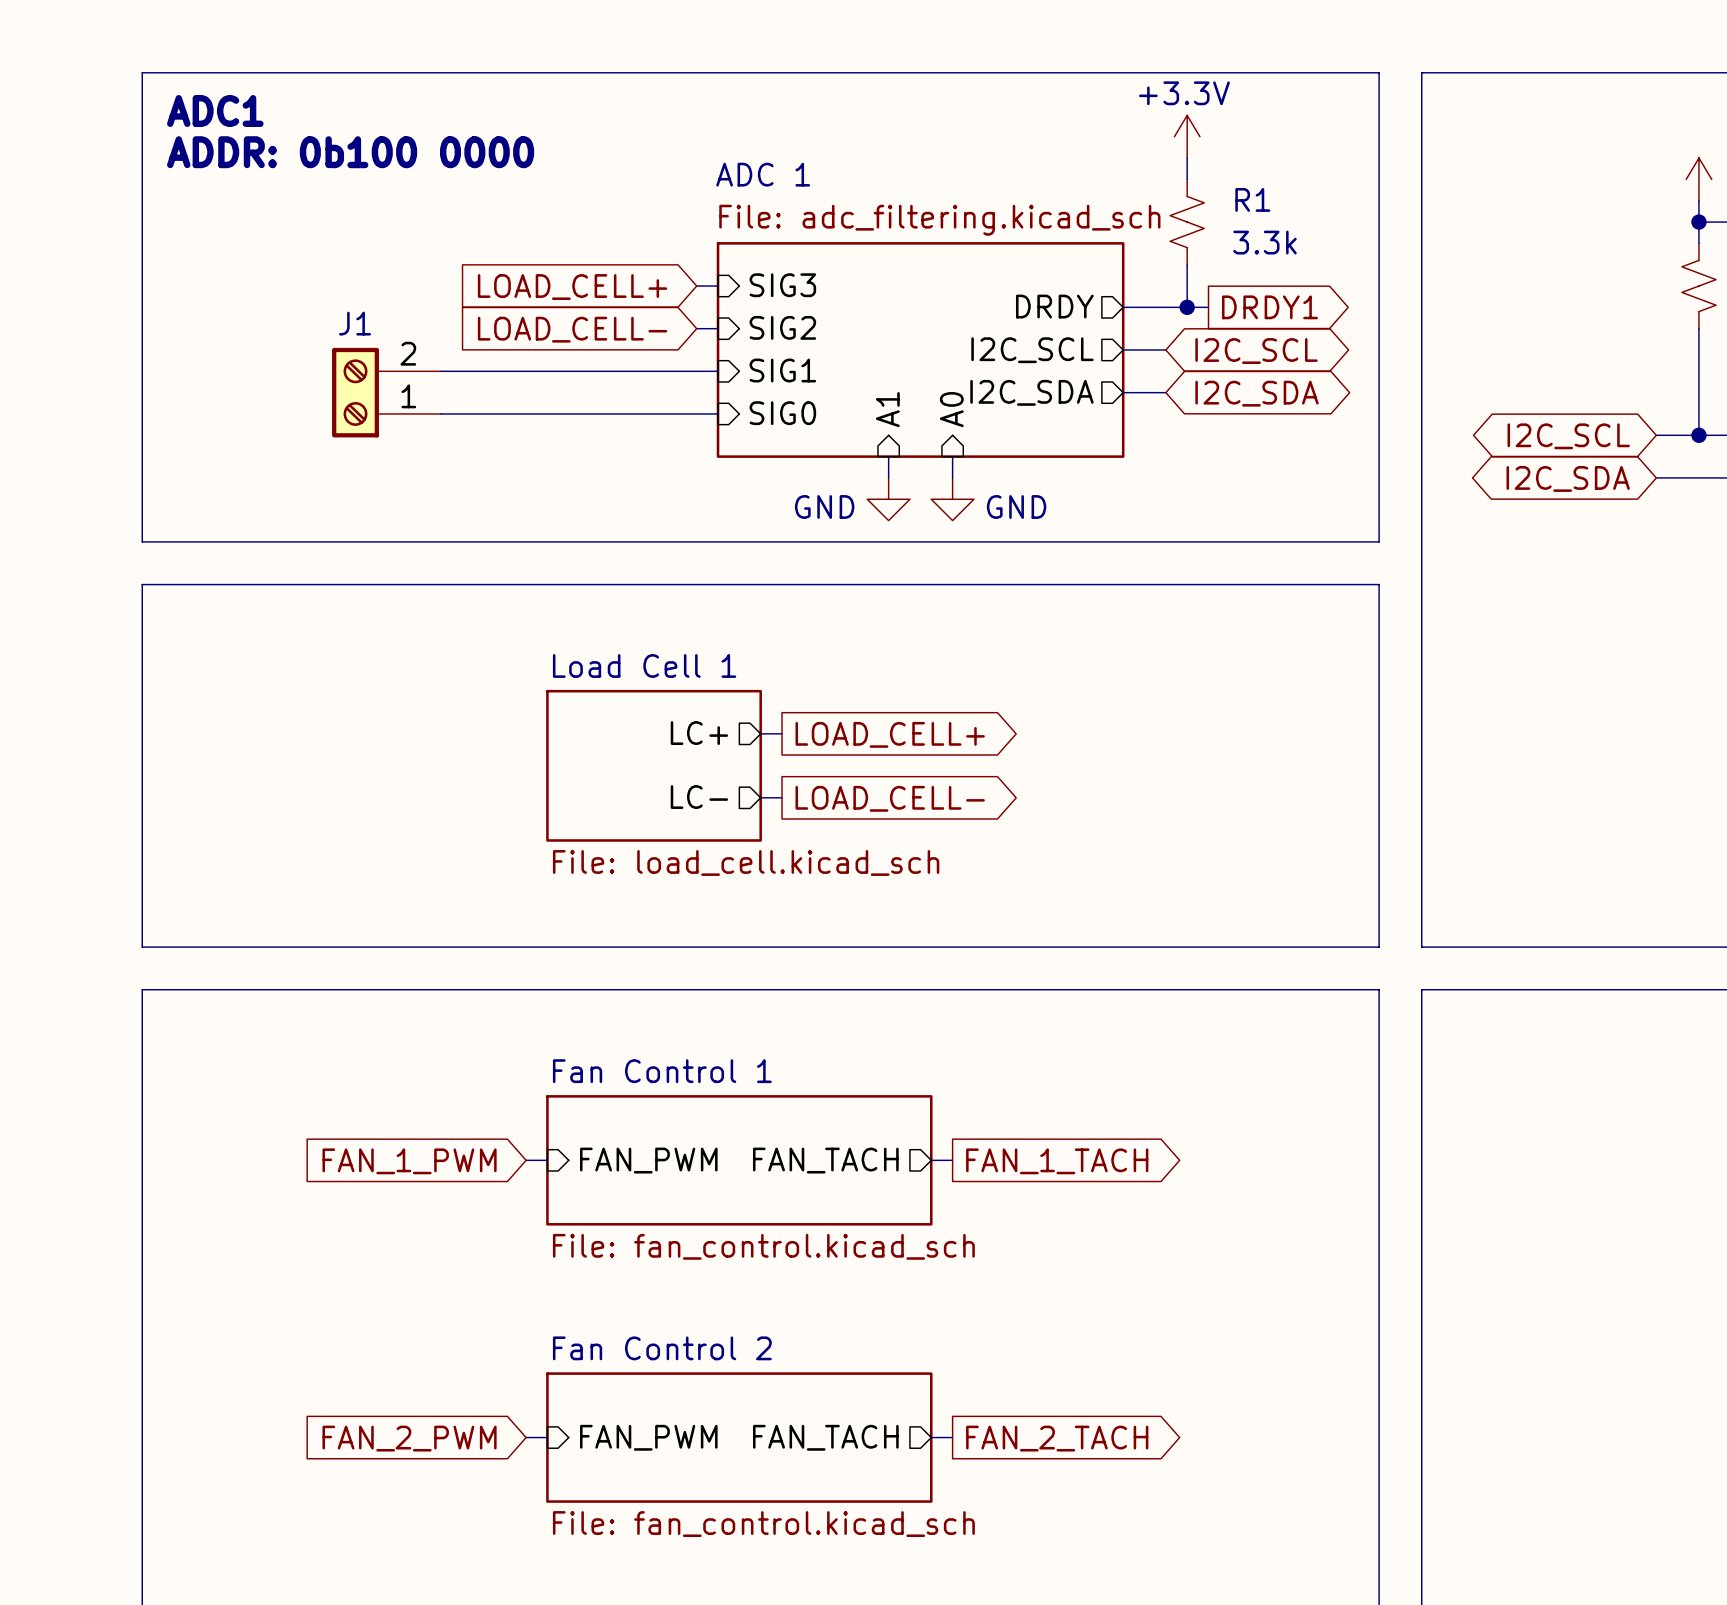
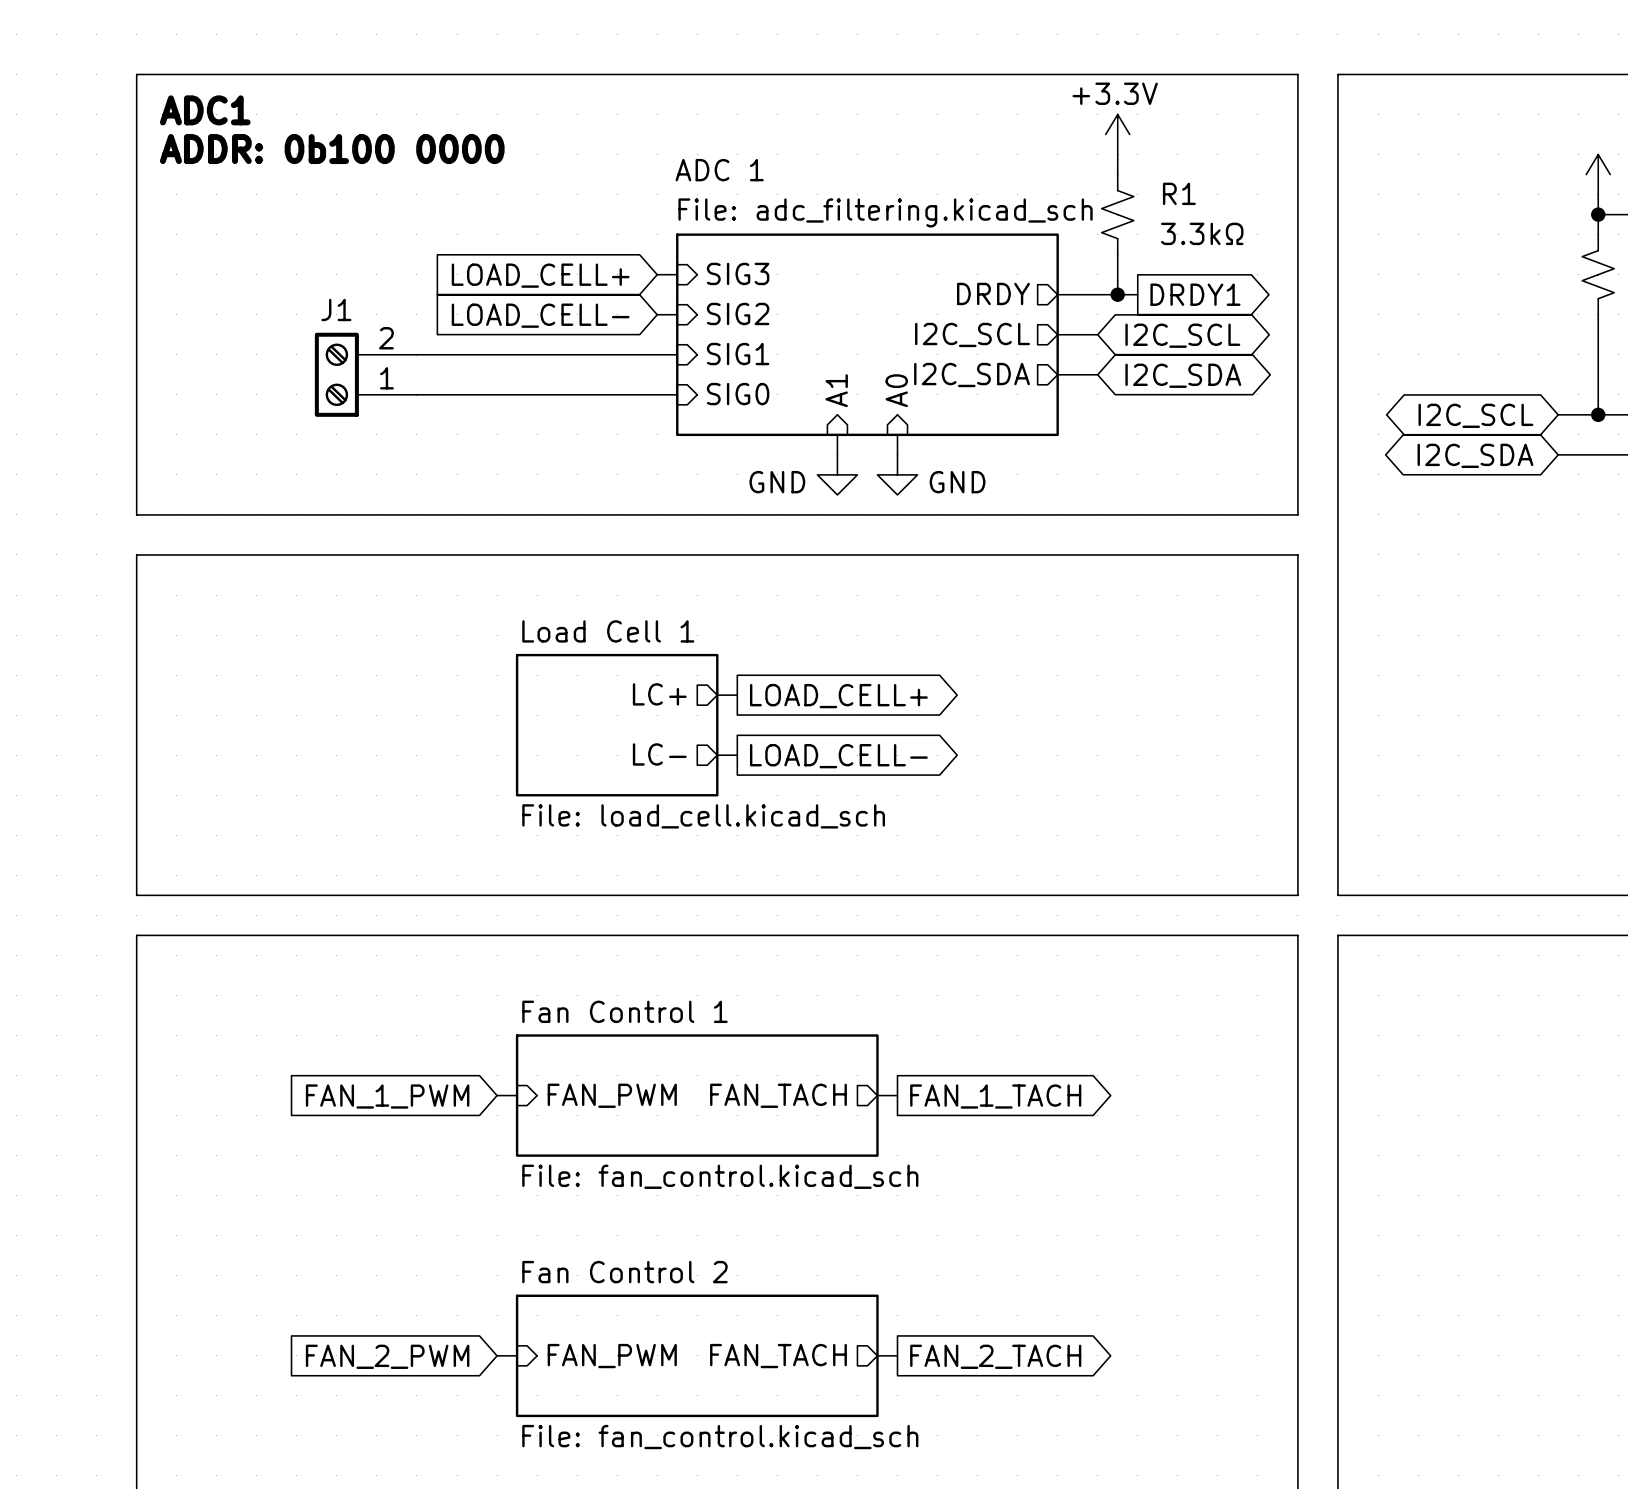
R1 value: 3.3k (1265, 242) -> 3.3kΩ (1202, 233)

